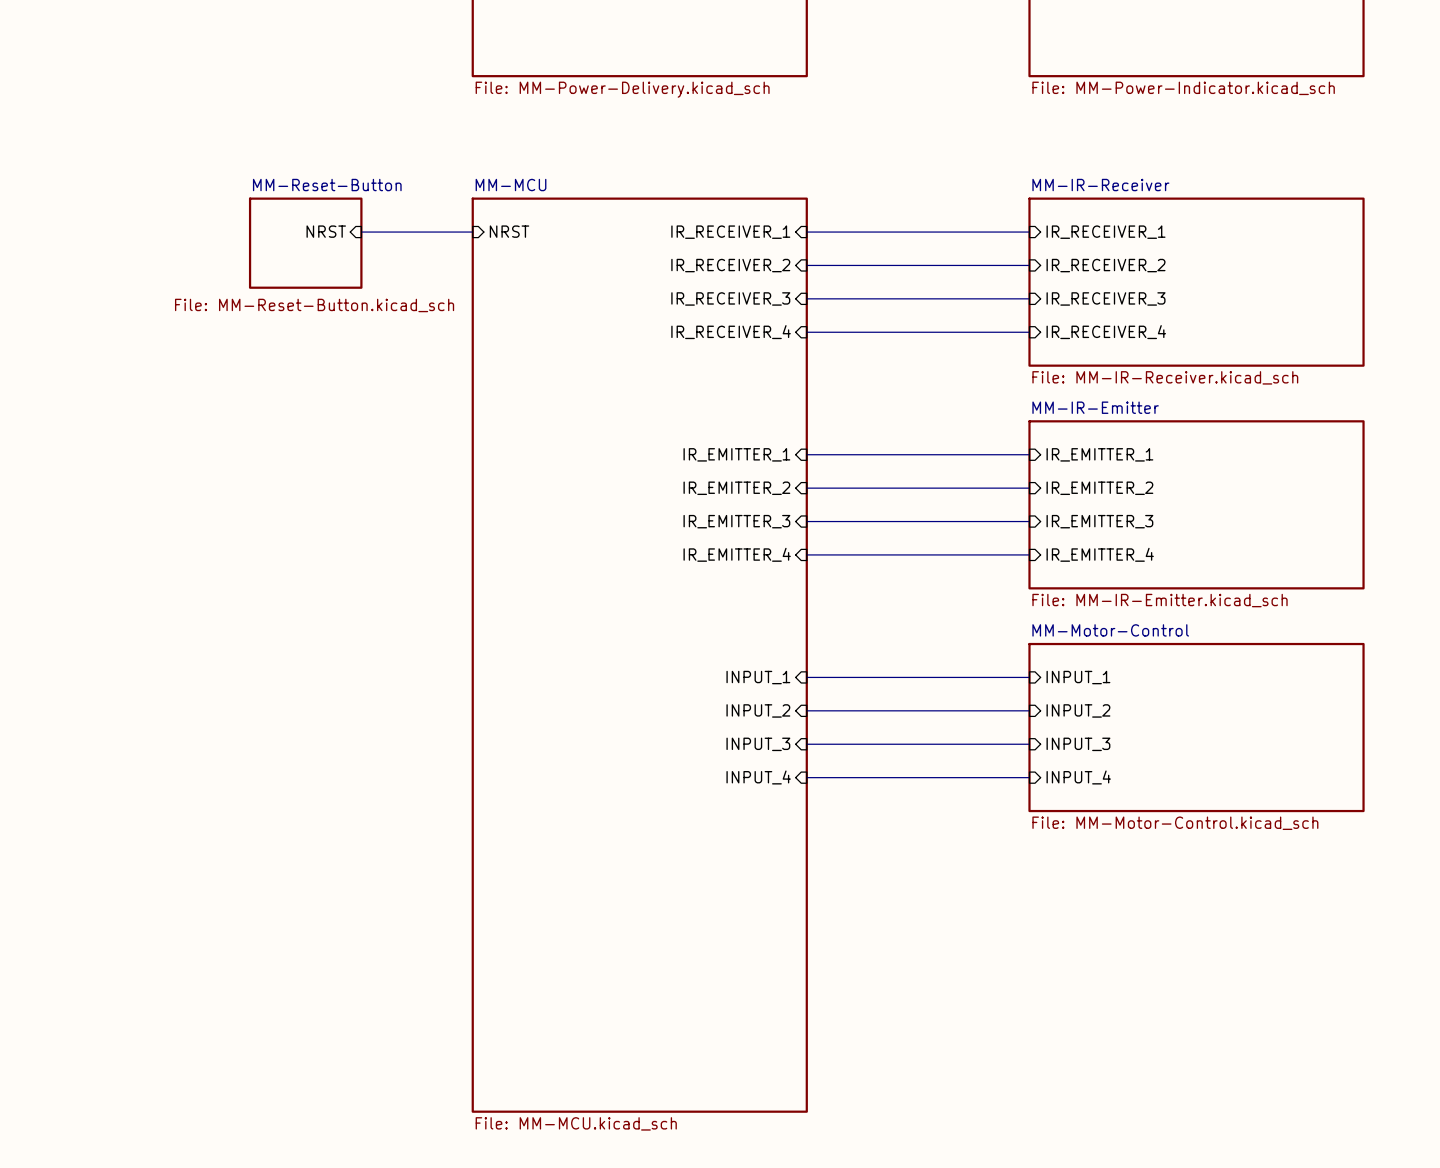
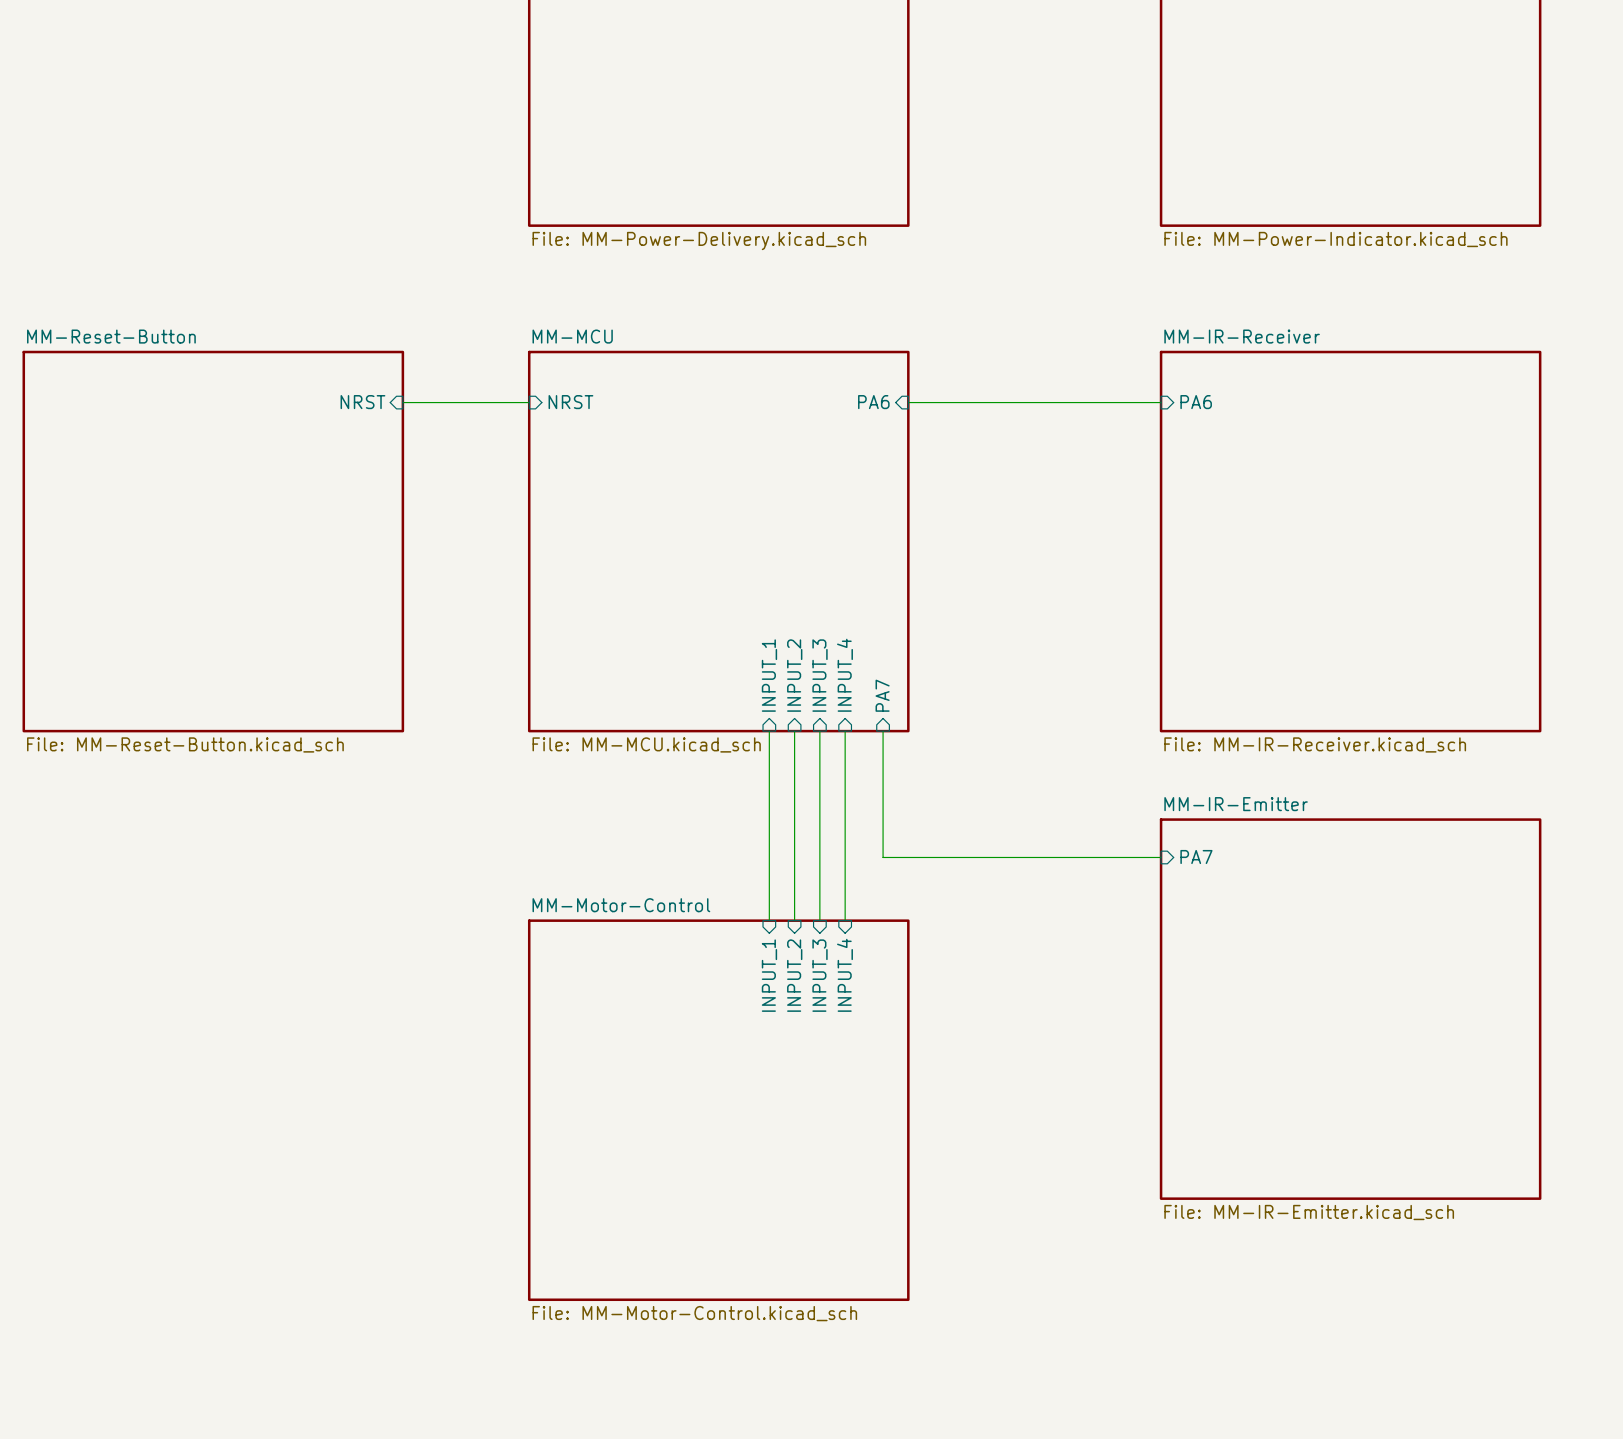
sheet pin: IR_RECEIVER_1 (730, 232) -> PA6 (873, 402)
sheet pin: IR_RECEIVER_1 (1106, 232) -> PA6 (1196, 402)
sheet MM-Reset-Button: File: MM-Reset-Button.kicad_sch (305, 243) -> none
sheet pin: IR_RECEIVER_2 (730, 265) -> none
wire: (806, 265) (1029, 265) -> none
sheet pin: IR_RECEIVER_2 (1106, 265) -> none
sheet MM-IR-Receiver: File: MM-IR-Receiver.kicad_sch (1196, 282) -> none
sheet pin: IR_RECEIVER_3 (730, 298) -> none
wire: (806, 298) (1029, 298) -> none
sheet pin: IR_RECEIVER_3 (1106, 298) -> none
sheet pin: IR_RECEIVER_4 (731, 332) -> none
wire: (806, 332) (1029, 332) -> none
sheet pin: IR_RECEIVER_4 (1106, 332) -> none
sheet MM-Reset-Button: none -> File: MM-Reset-Button.kicad_sch (213, 541)
sheet MM-MCU: none -> File: MM-MCU.kicad_sch (718, 541)
sheet MM-IR-Receiver: none -> File: MM-IR-Receiver.kicad_sch (1350, 541)
sheet pin: IR_EMITTER_1 (736, 454) -> none
wire: (806, 454) (1029, 454) -> none
sheet pin: IR_EMITTER_1 (1099, 454) -> none
sheet pin: none -> INPUT_1 (769, 675)
sheet pin: none -> INPUT_2 (794, 675)
sheet pin: none -> INPUT_3 (820, 675)
sheet pin: none -> INPUT_4 (844, 675)
sheet pin: IR_EMITTER_2 (736, 488) -> none
wire: (806, 488) (1029, 488) -> none
sheet pin: IR_EMITTER_2 (1099, 488) -> none
sheet pin: none -> PA7 (882, 695)
sheet MM-IR-Emitter: File: MM-IR-Emitter.kicad_sch (1196, 504) -> none
wire: none -> (769, 731) (769, 920)
wire: none -> (794, 731) (794, 920)
wire: none -> (819, 731) (819, 920)
sheet pin: IR_EMITTER_3 (736, 521) -> none
wire: none -> (845, 731) (845, 920)
wire: none -> (883, 731) (883, 857) (1161, 857)
wire: (806, 521) (1029, 521) -> none
sheet pin: IR_EMITTER_3 (1099, 521) -> none
sheet pin: IR_EMITTER_4 (737, 554) -> none
wire: (806, 554) (1029, 554) -> none
sheet pin: IR_EMITTER_4 (1100, 554) -> none
sheet pin: none -> PA7 (1196, 857)
sheet MM-MCU: File: MM-MCU.kicad_sch (639, 655) -> none
sheet pin: INPUT_1 (758, 677) -> none
wire: (806, 677) (1029, 677) -> none
sheet pin: INPUT_1 (1078, 677) -> none
sheet pin rotation: 0° (758, 710) -> 90° counterclockwise (794, 975)
wire: (806, 710) (1029, 710) -> none
sheet pin: INPUT_2 (1078, 710) -> none
sheet MM-Motor-Control: File: MM-Motor-Control.kicad_sch (1196, 727) -> none
sheet pin: none -> INPUT_1 (769, 975)
sheet pin rotation: 0° (758, 744) -> 90° counterclockwise (820, 975)
wire: (806, 744) (1029, 744) -> none
sheet pin: INPUT_3 (1078, 744) -> none
sheet MM-IR-Emitter: none -> File: MM-IR-Emitter.kicad_sch (1350, 1009)
sheet pin rotation: 0° (758, 777) -> 90° counterclockwise (844, 975)
wire: (806, 777) (1029, 777) -> none
sheet pin: INPUT_4 (1078, 777) -> none
sheet MM-Motor-Control: none -> File: MM-Motor-Control.kicad_sch (718, 1110)

